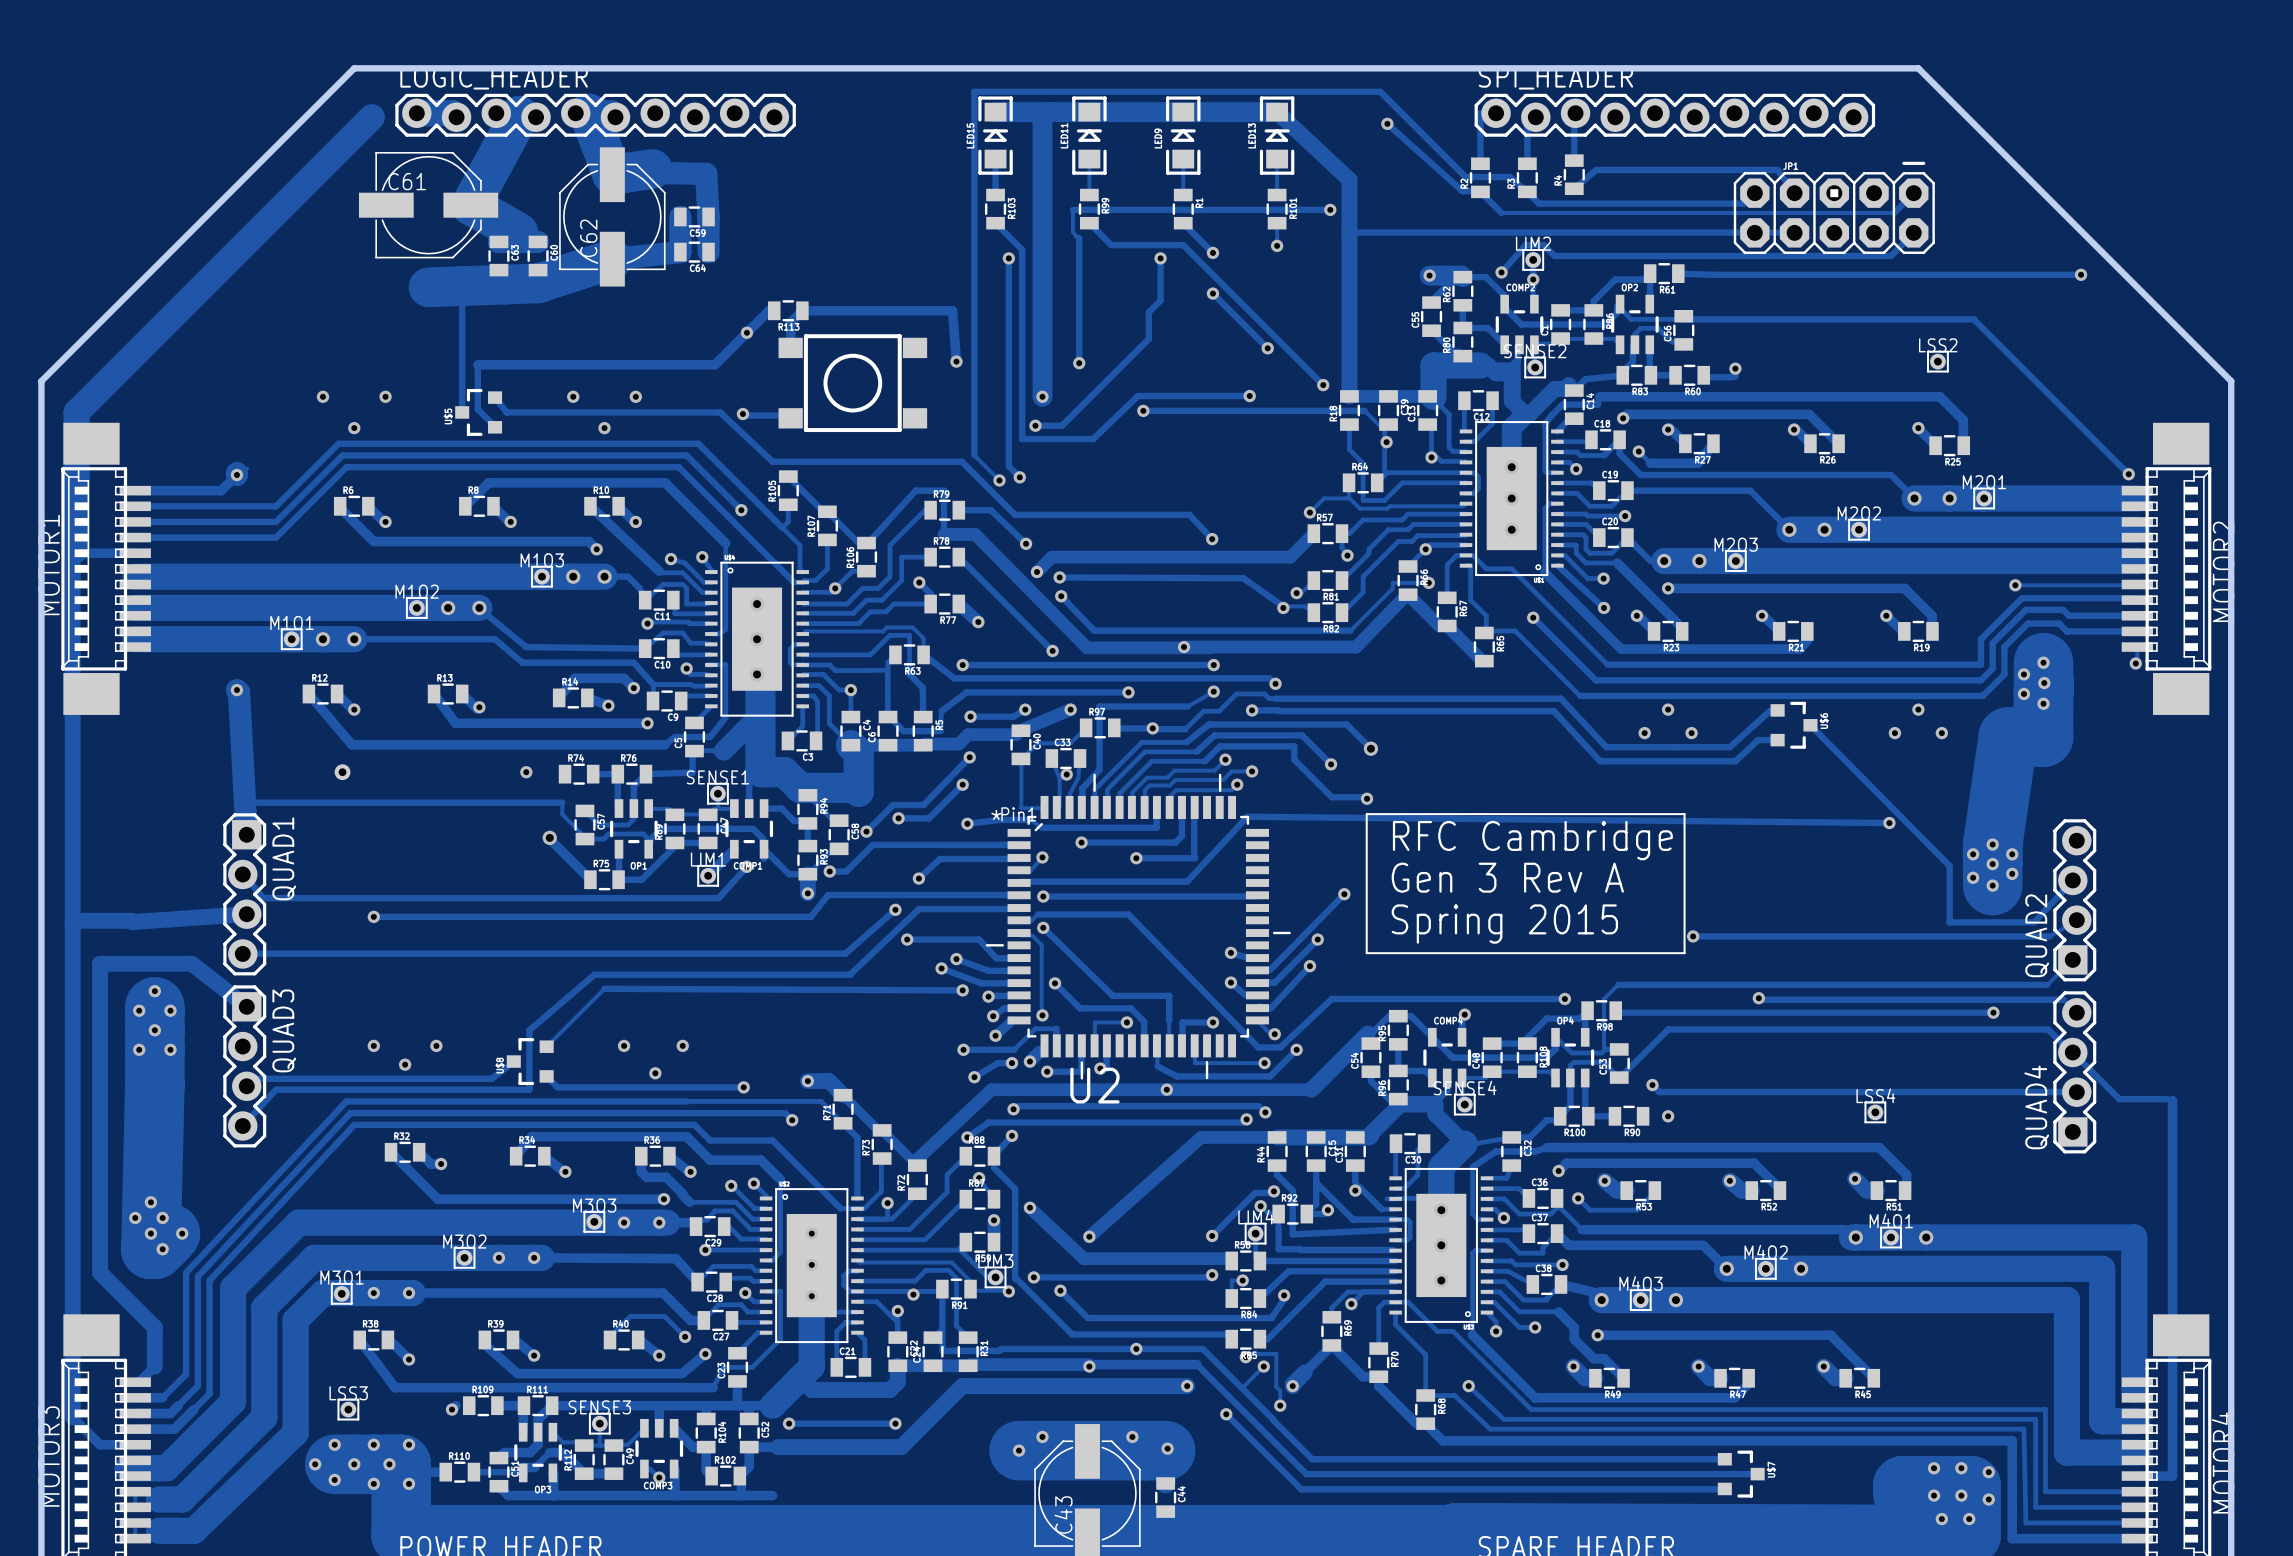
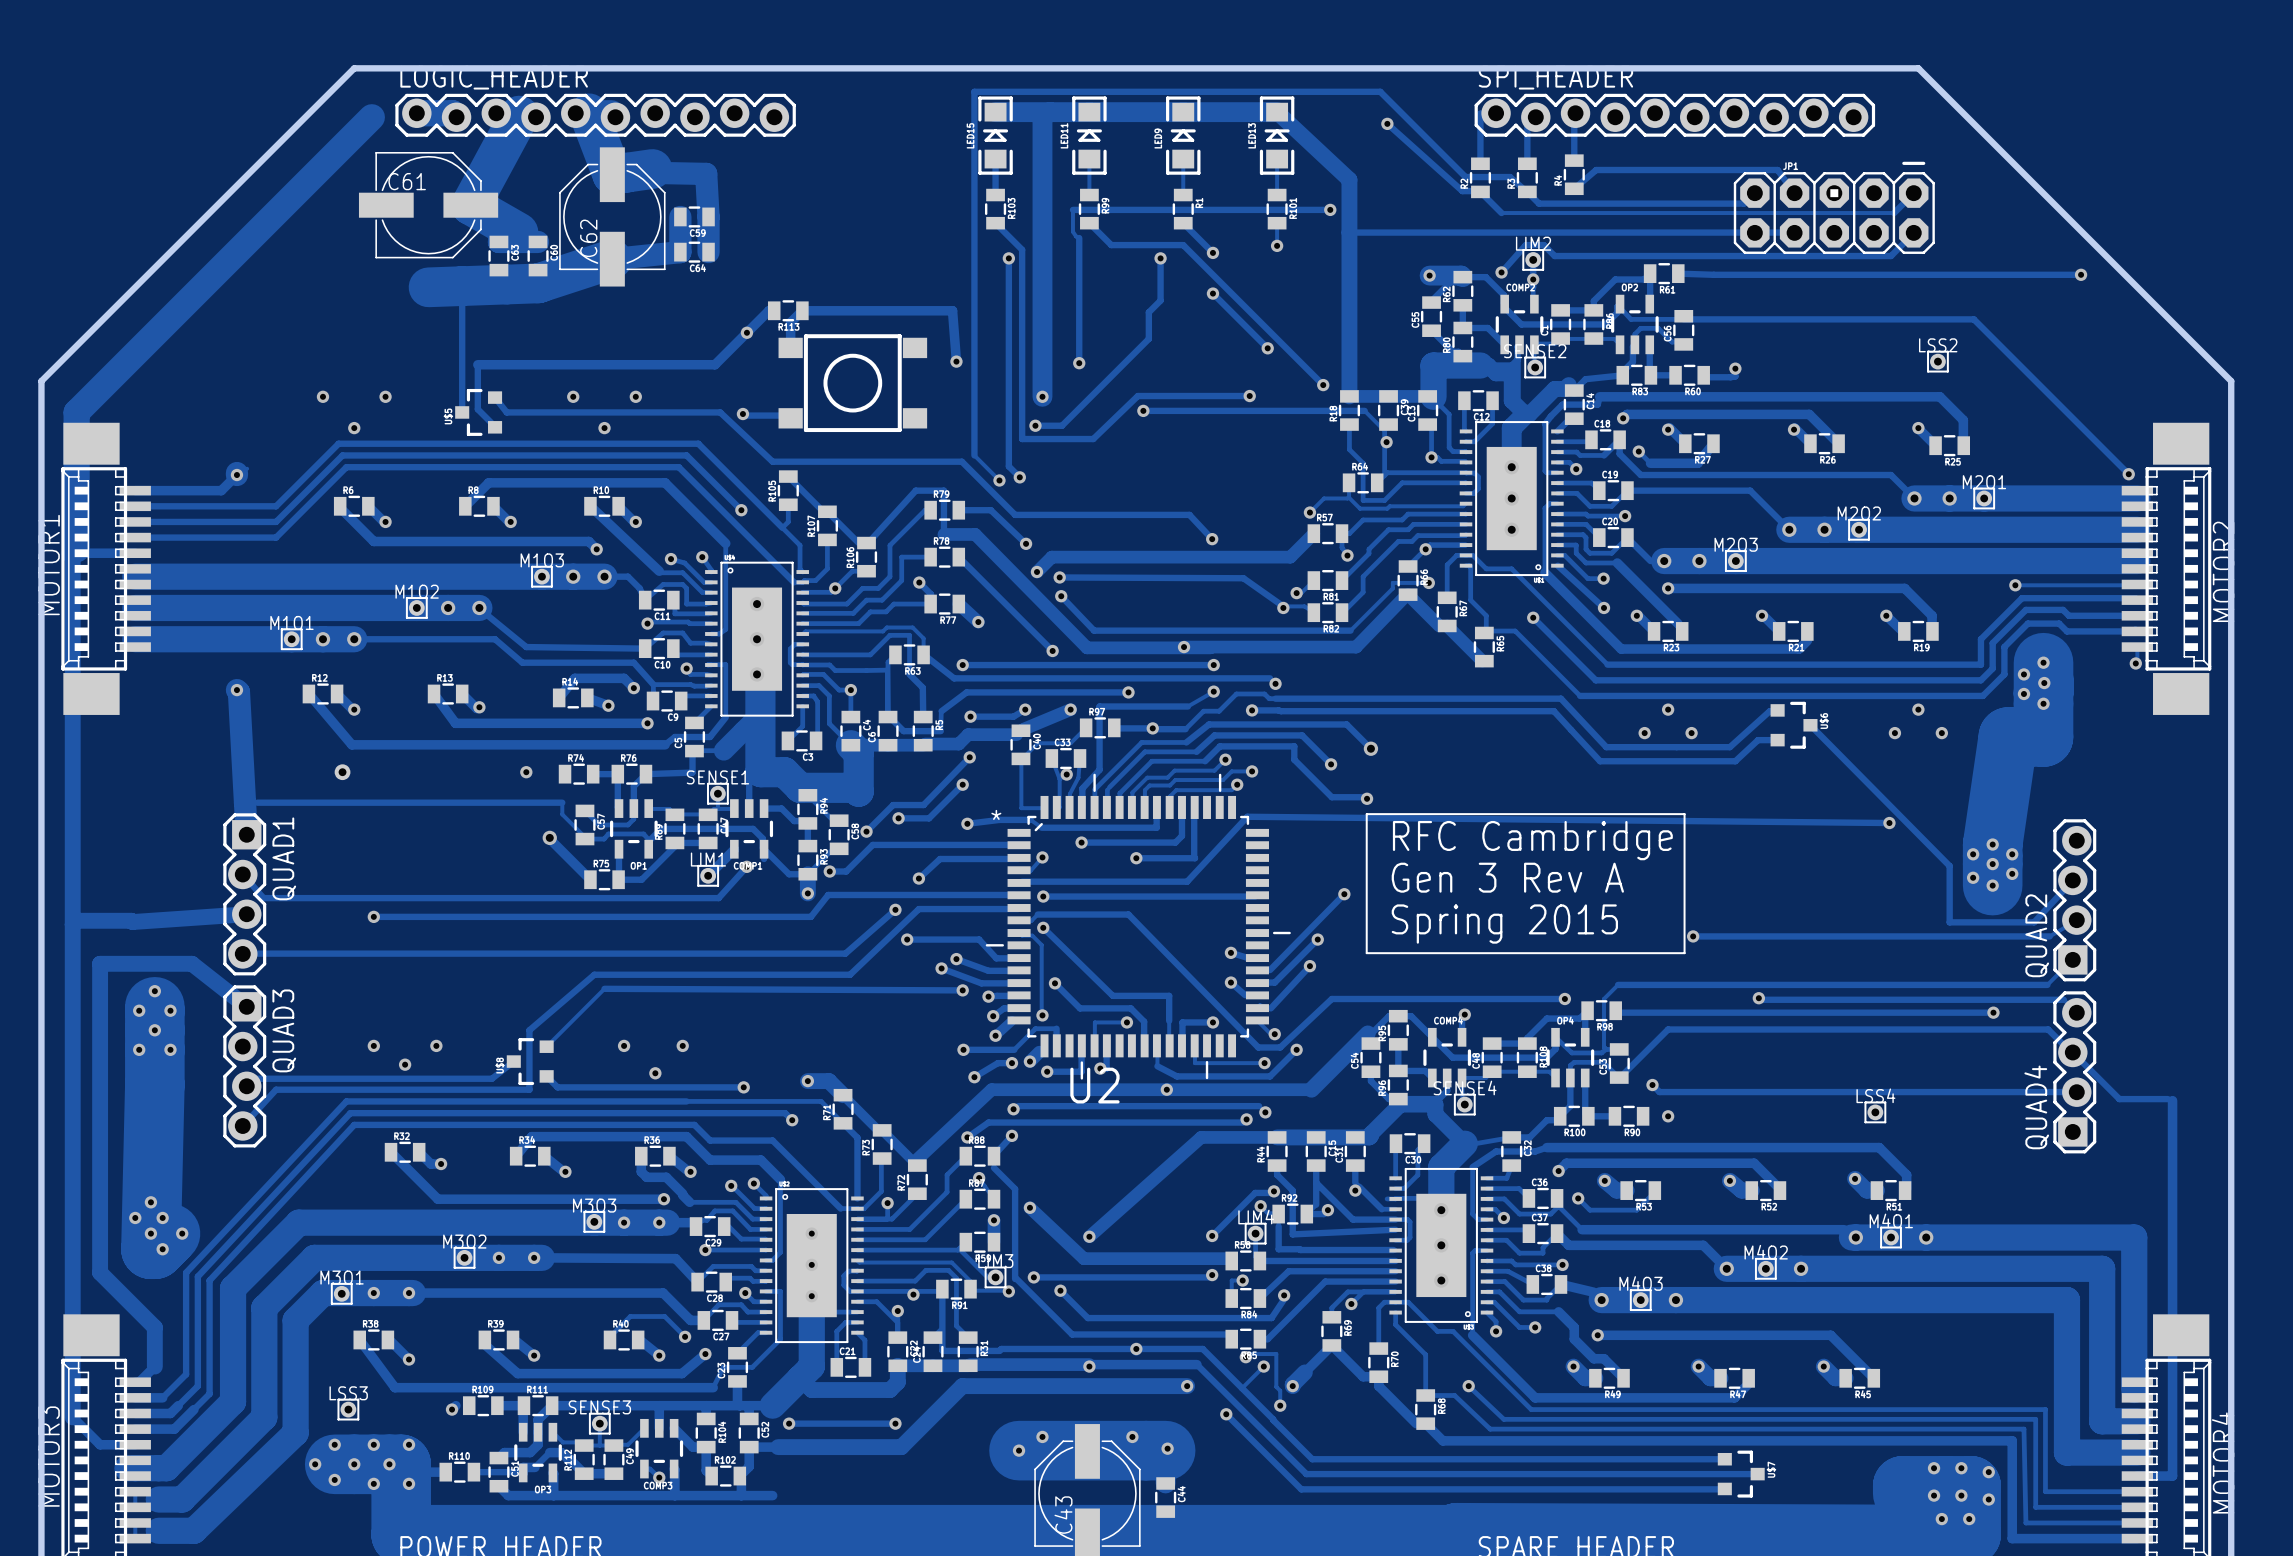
text: Pin1 (1018, 814) -> none

